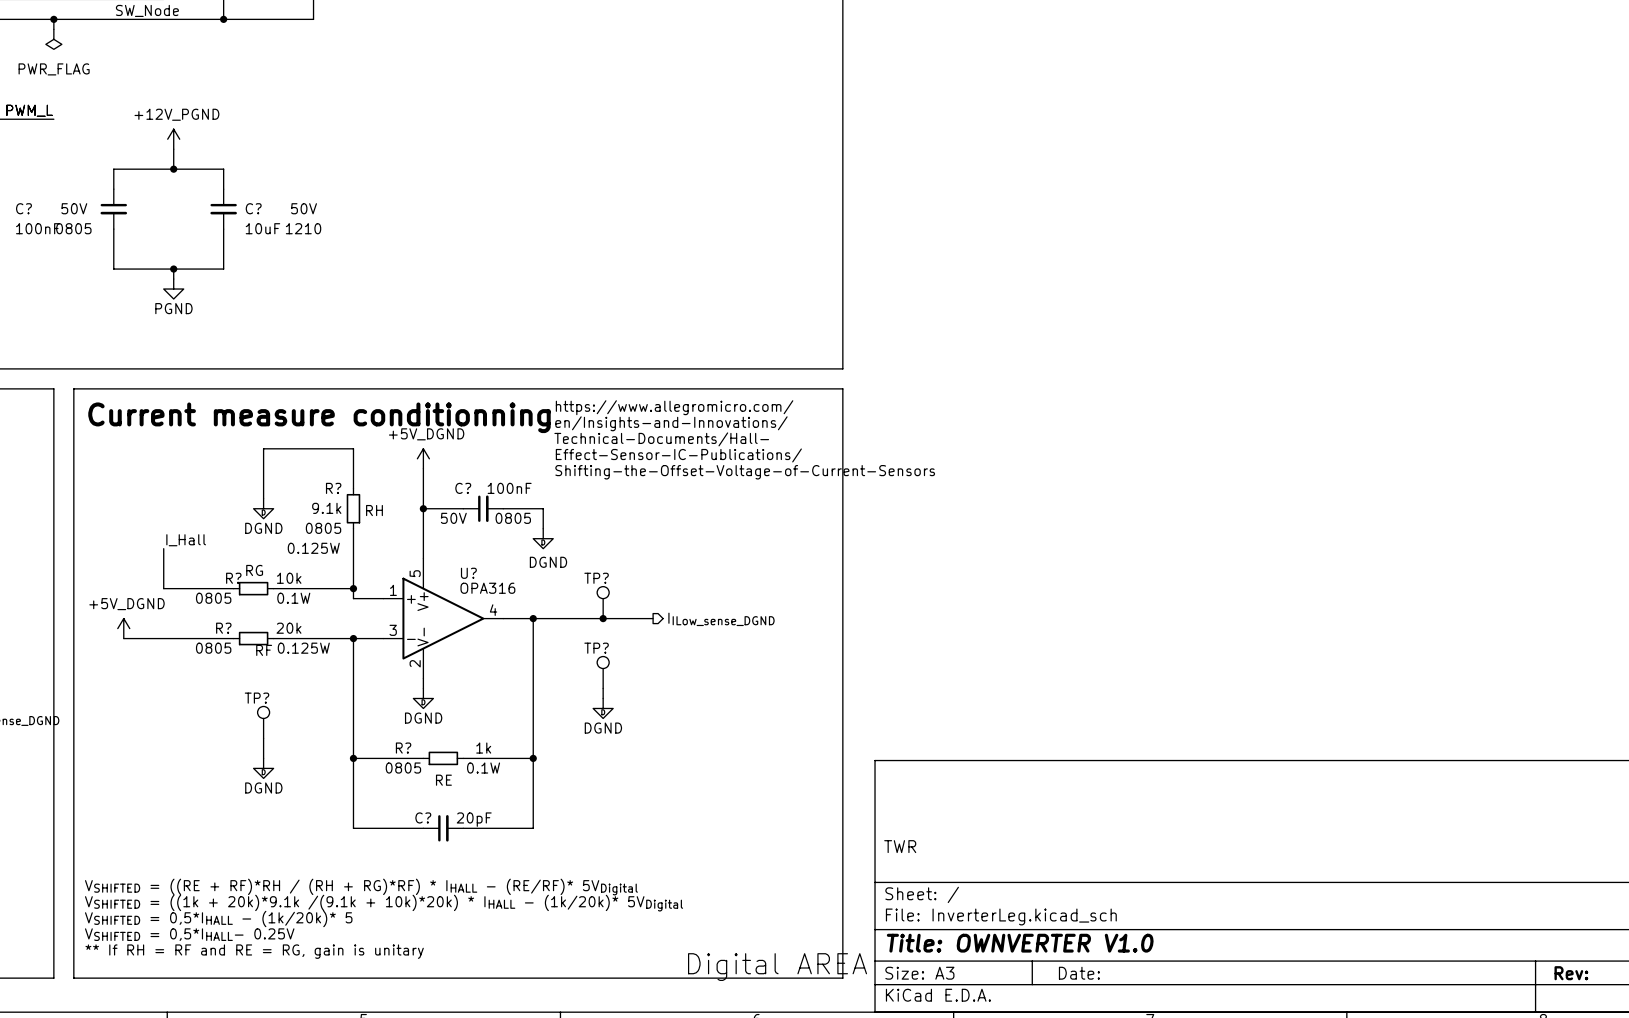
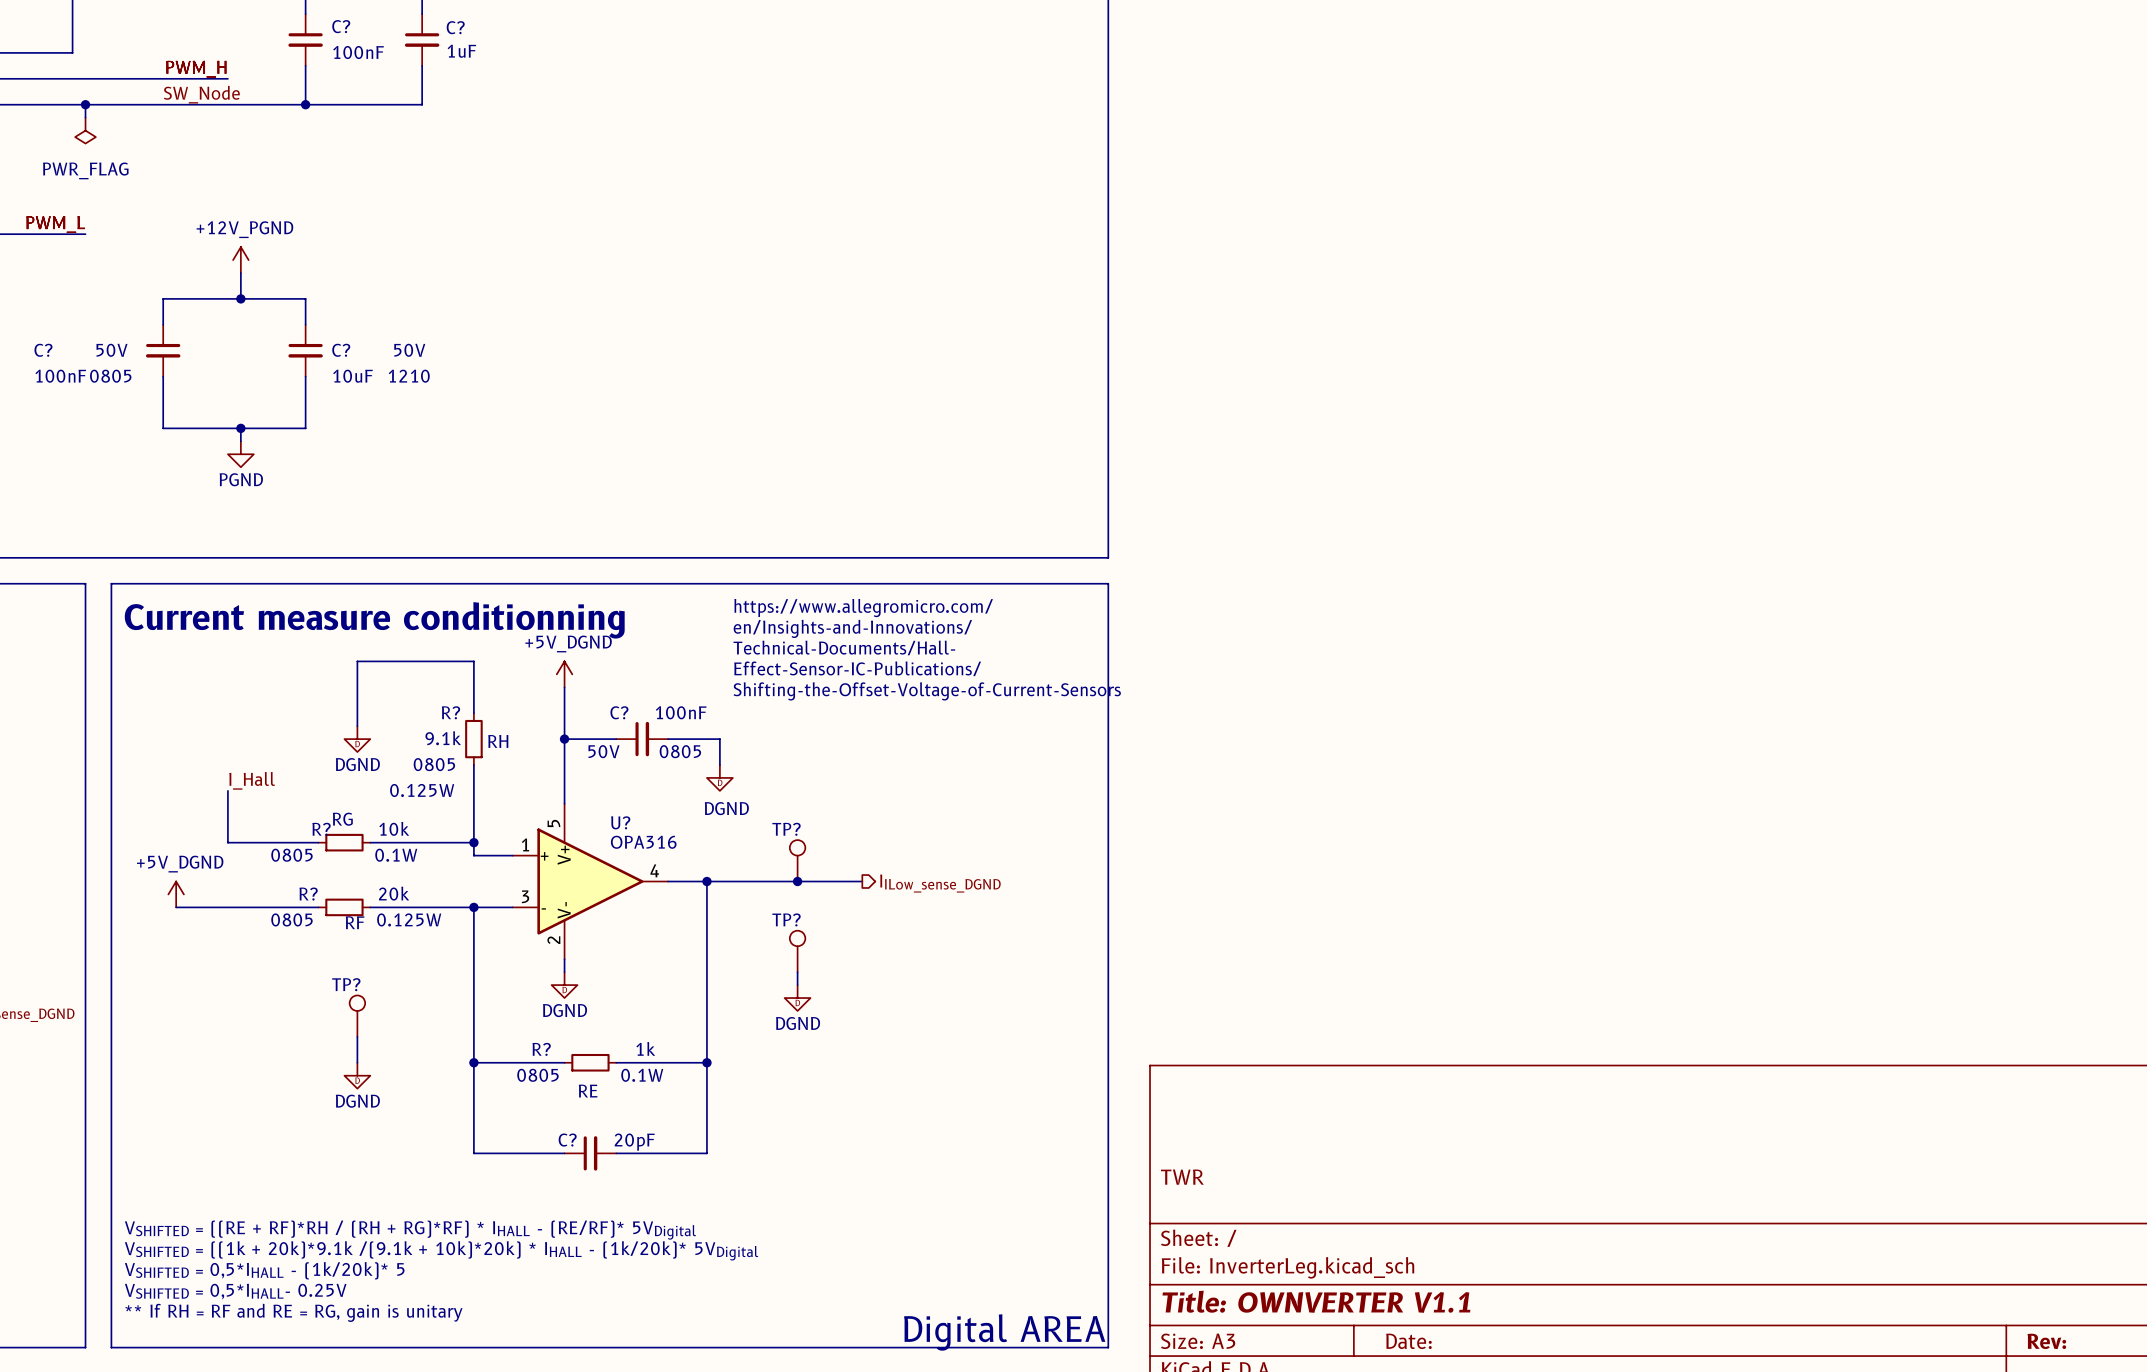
title block: Title: OWNVERTER V1.0 (1020, 943) -> Title: OWNVERTER V1.1 (1316, 1301)

